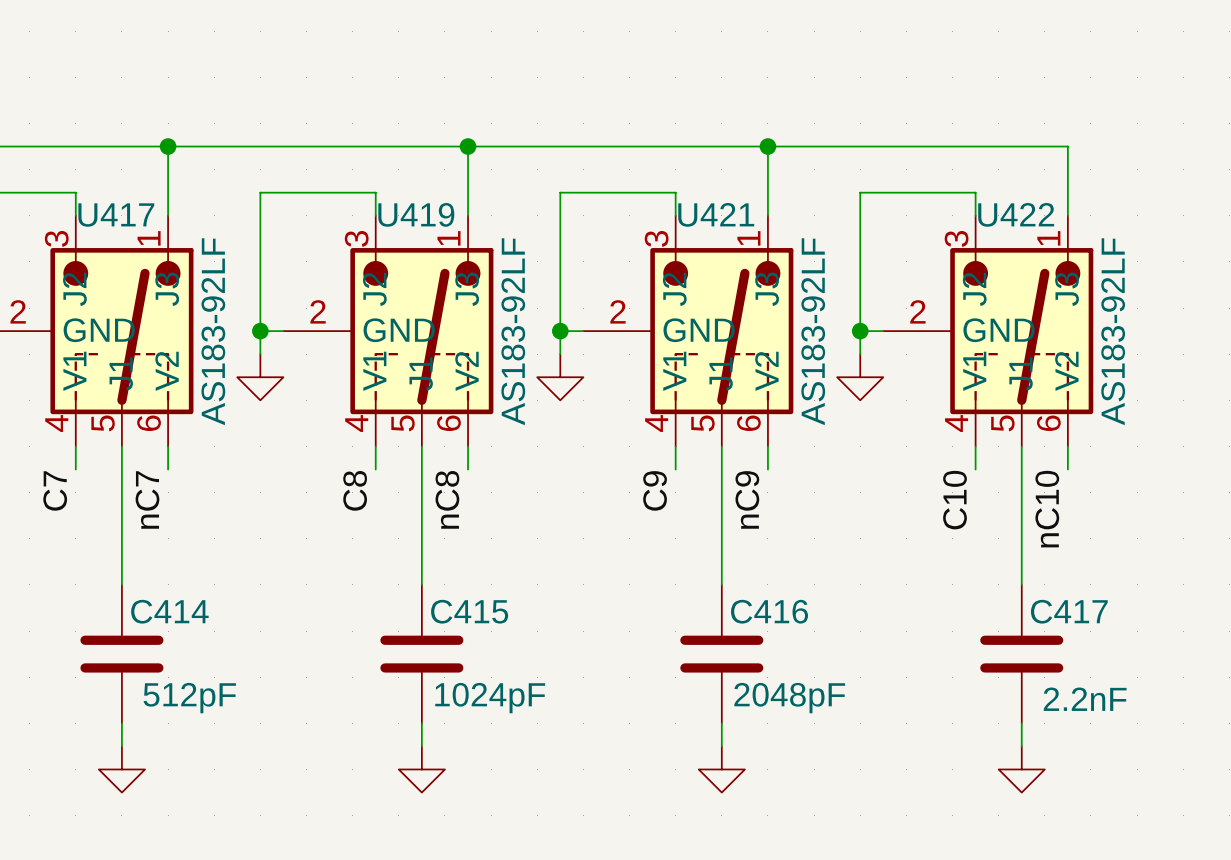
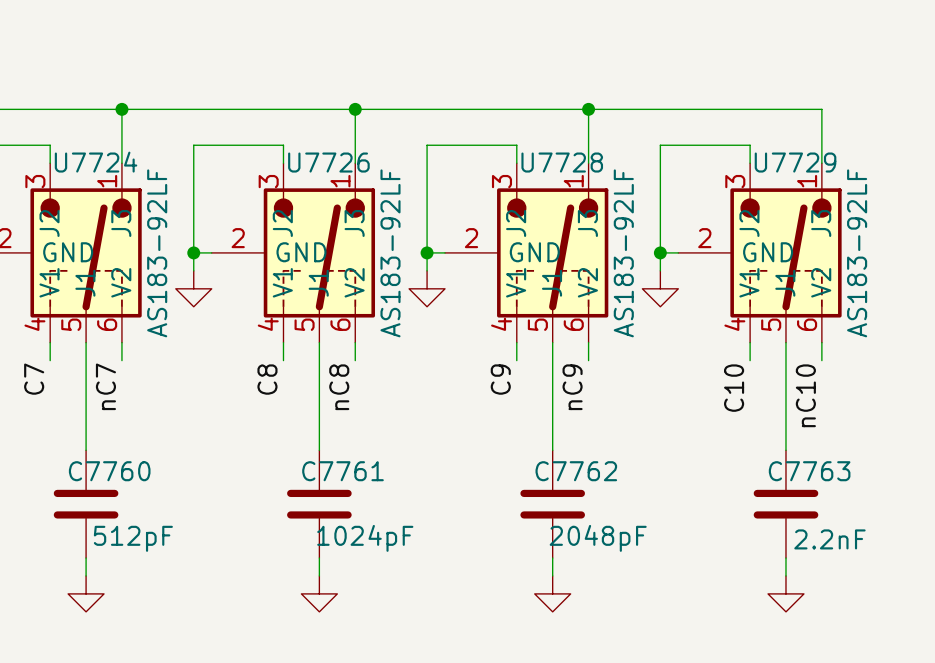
U419 name: U419 (416, 214) -> U7726 (328, 162)
U421 name: U421 (716, 214) -> U7728 (562, 162)
U422 name: U422 (1016, 214) -> U7729 (795, 162)
U417 name: U417 (116, 215) -> U7724 (96, 162)
C414 name: C414 (169, 611) -> C7760 (109, 471)
C415 name: C415 (469, 611) -> C7761 (343, 471)
C416 name: C416 (769, 611) -> C7762 (576, 471)
C417 name: C417 (1069, 611) -> C7763 (809, 471)

